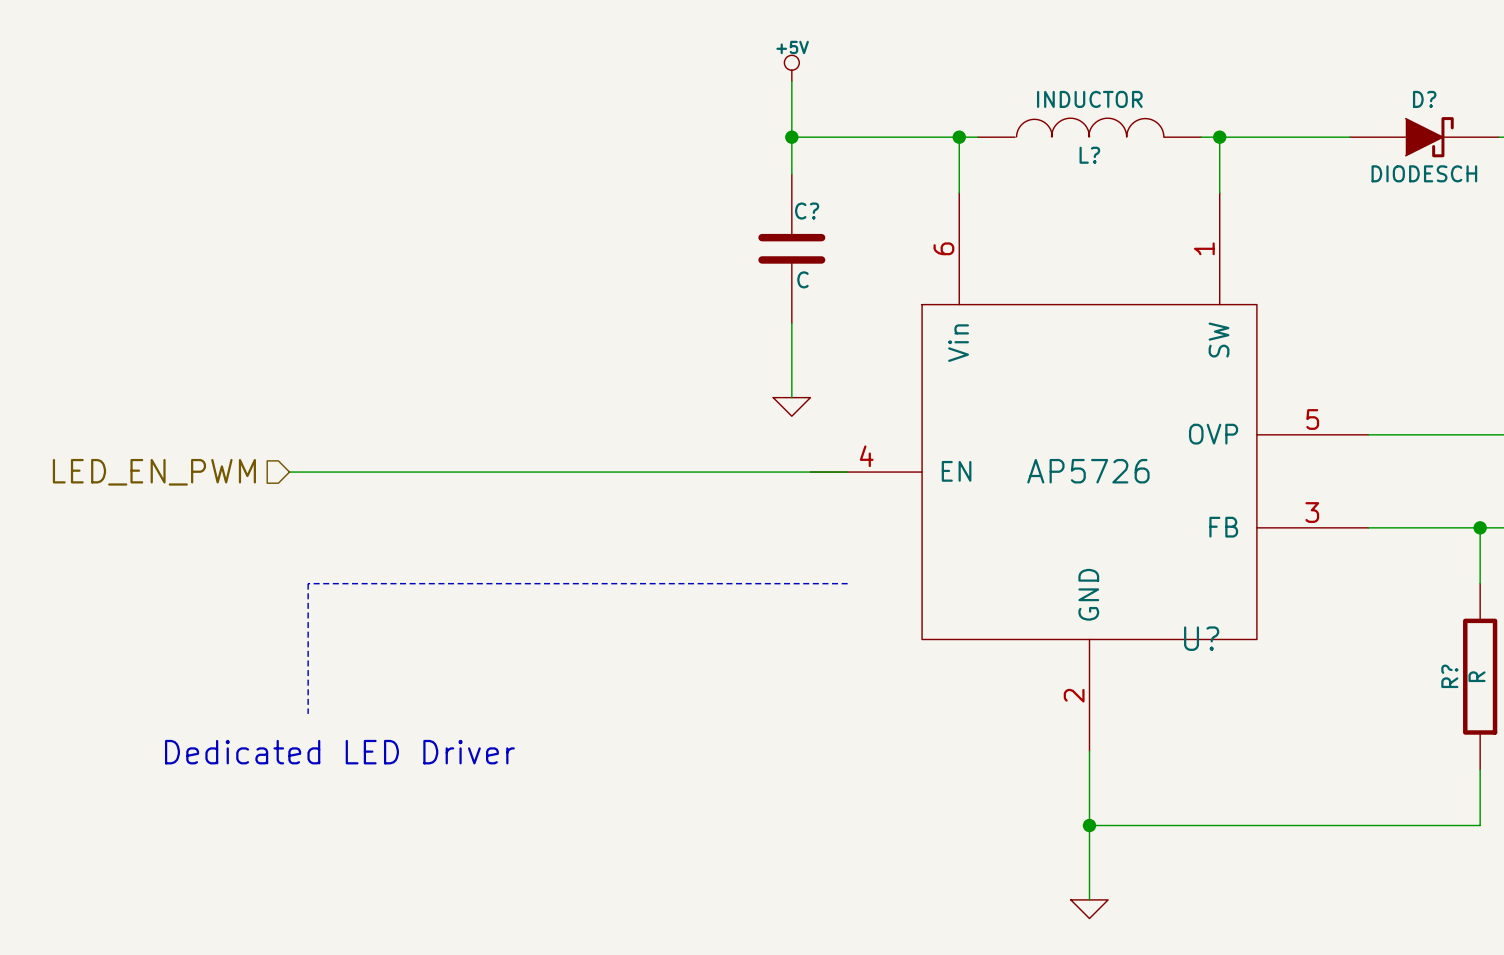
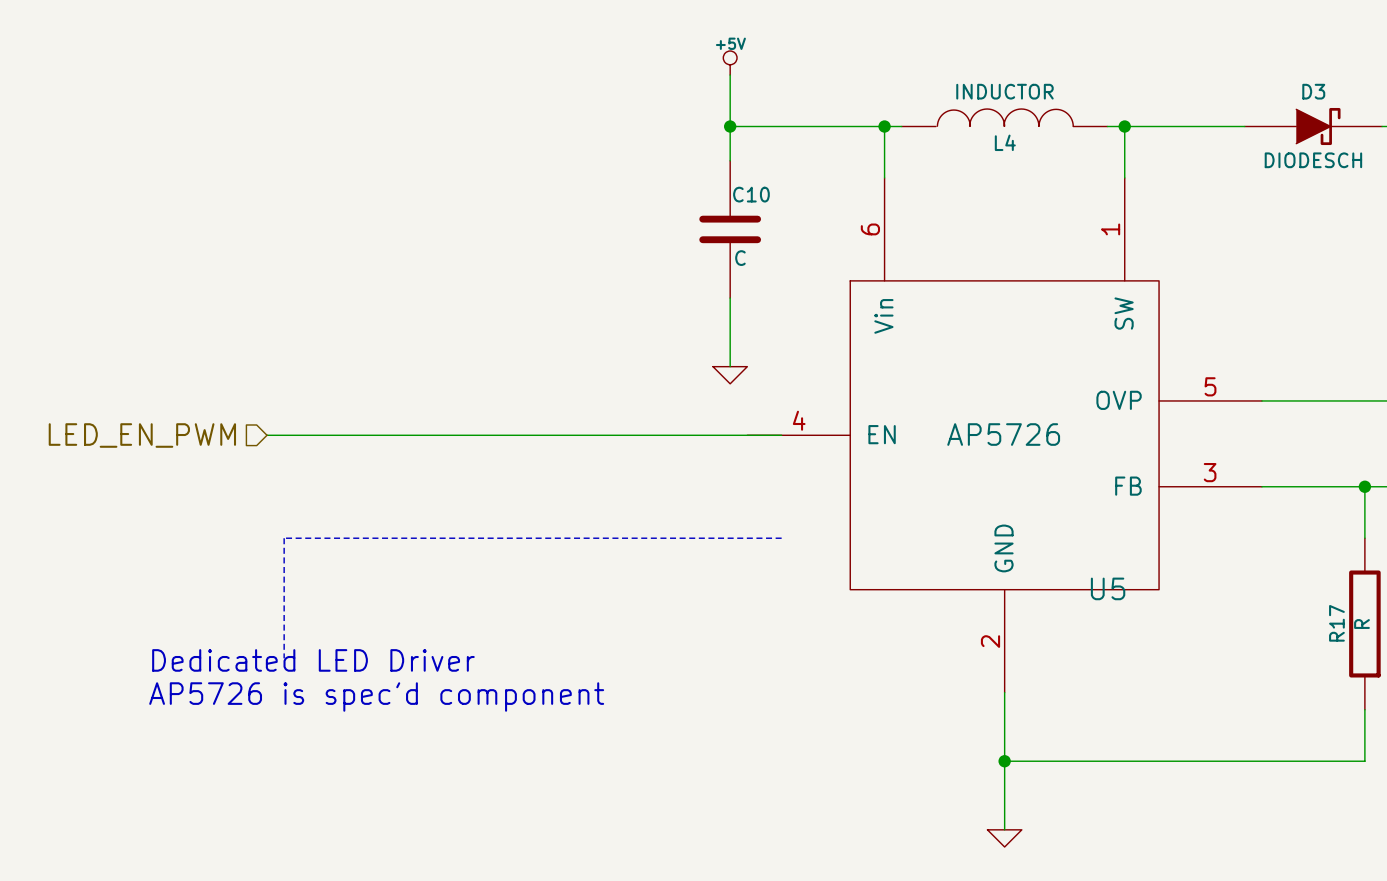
D? name: D? (1424, 99) -> D3 (1313, 91)
L? name: L? (1089, 155) -> L4 (1005, 142)
C? name: C? (807, 211) -> C10 (751, 194)
U? name: U? (1201, 638) -> U5 (1108, 588)
R? name: R? (1449, 676) -> R17 (1336, 623)
text: none -> Dedicated LED Driver (313, 660)
text: Dedicated LED Driver (339, 752) -> AP5726 is spec'd component (376, 697)

